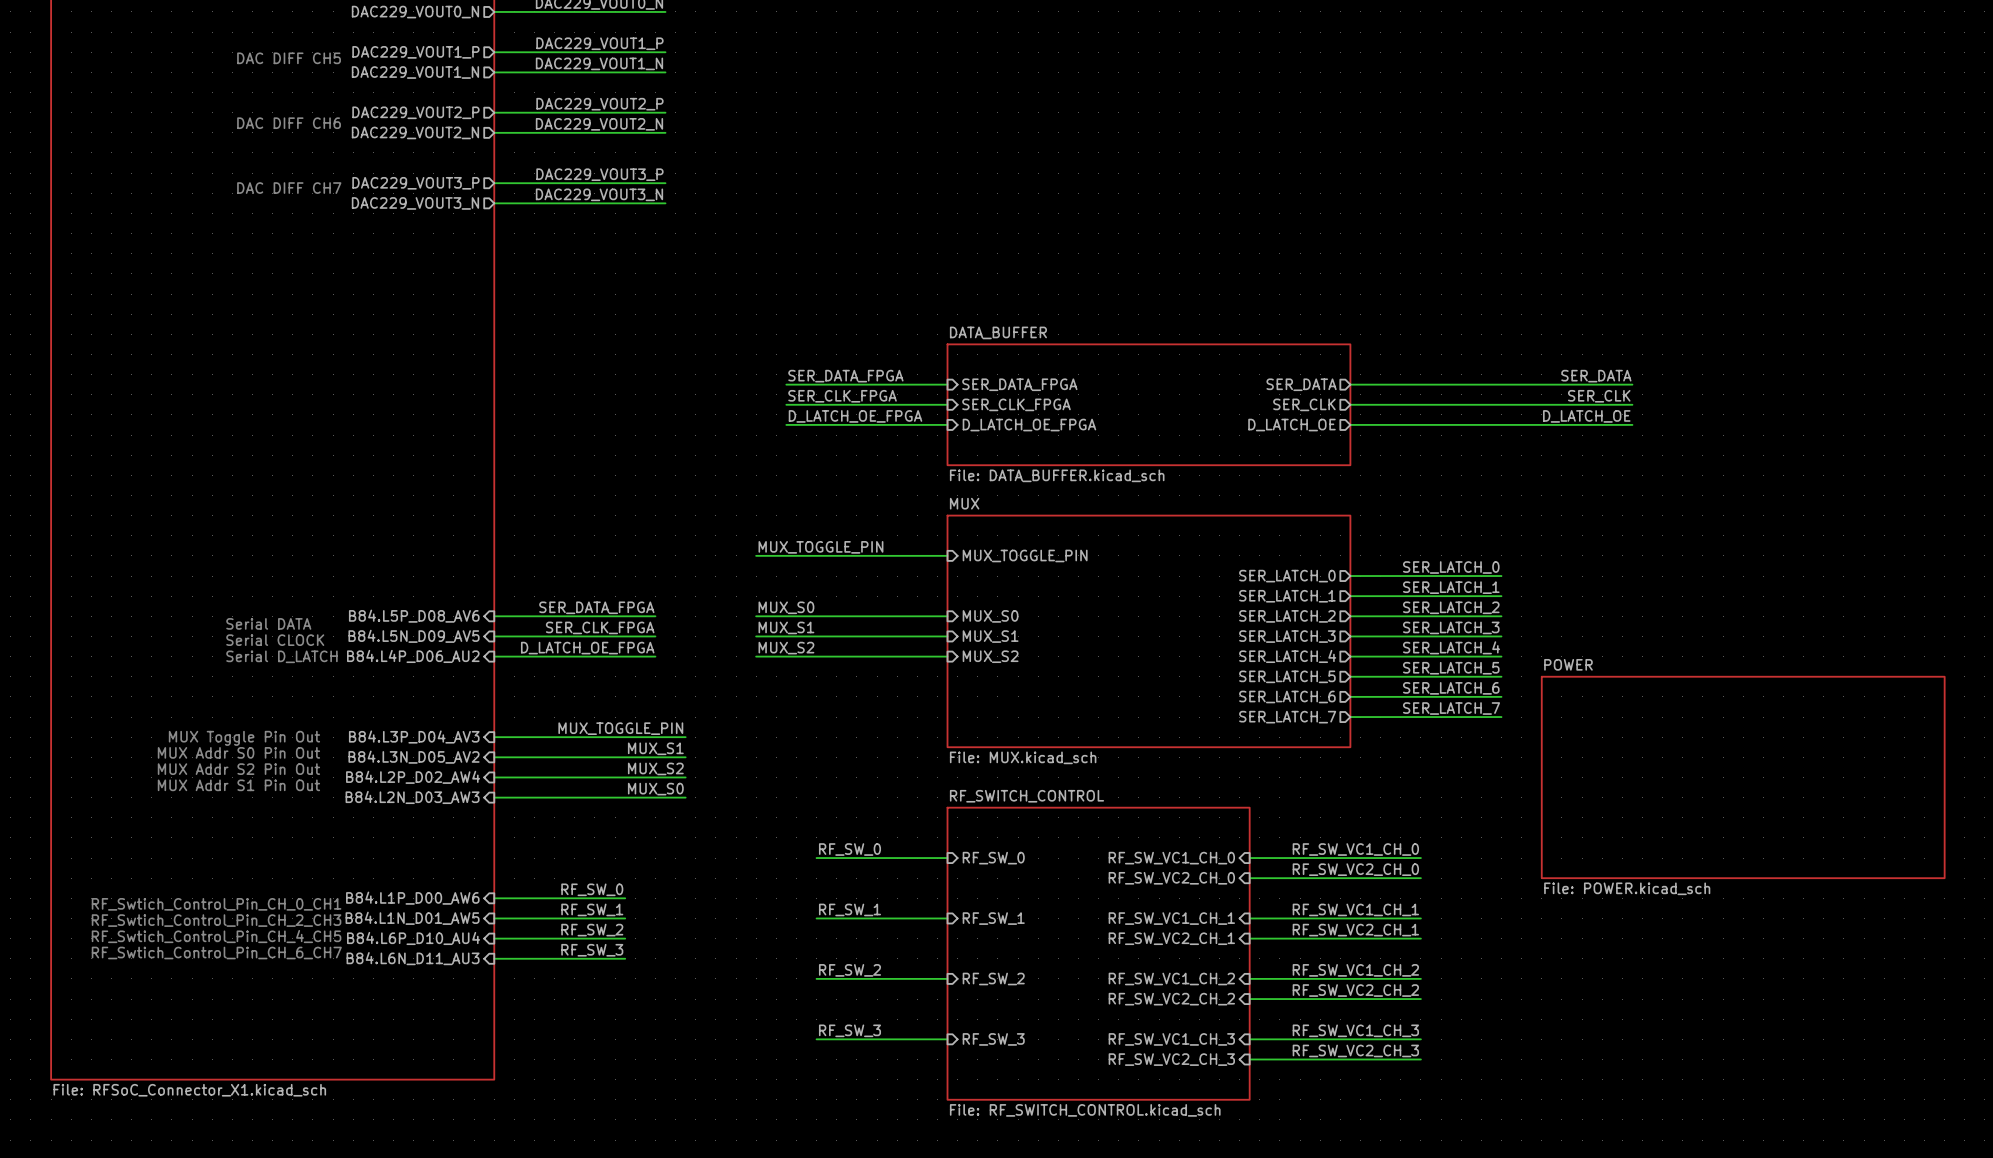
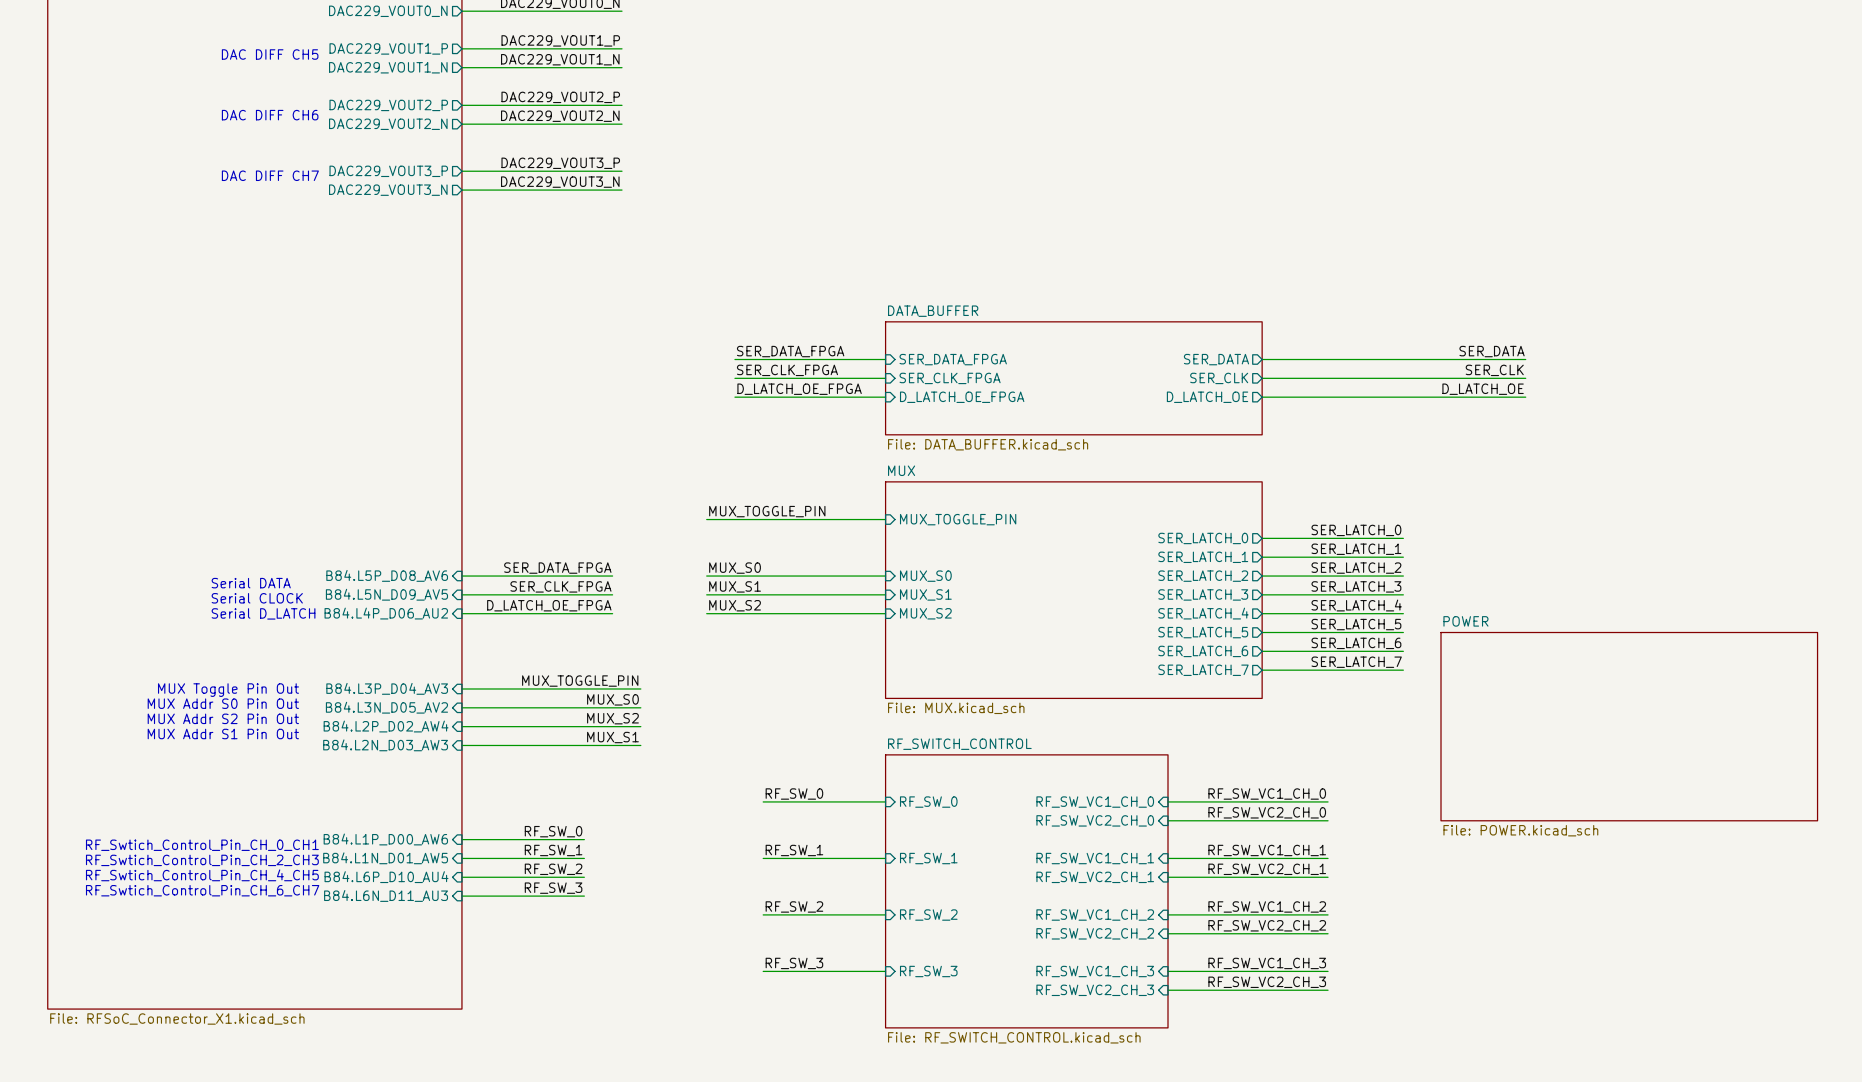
label: MUX_S1 (655, 748) -> MUX_S0 (612, 699)
label: MUX_S0 (655, 789) -> MUX_S1 (612, 737)

